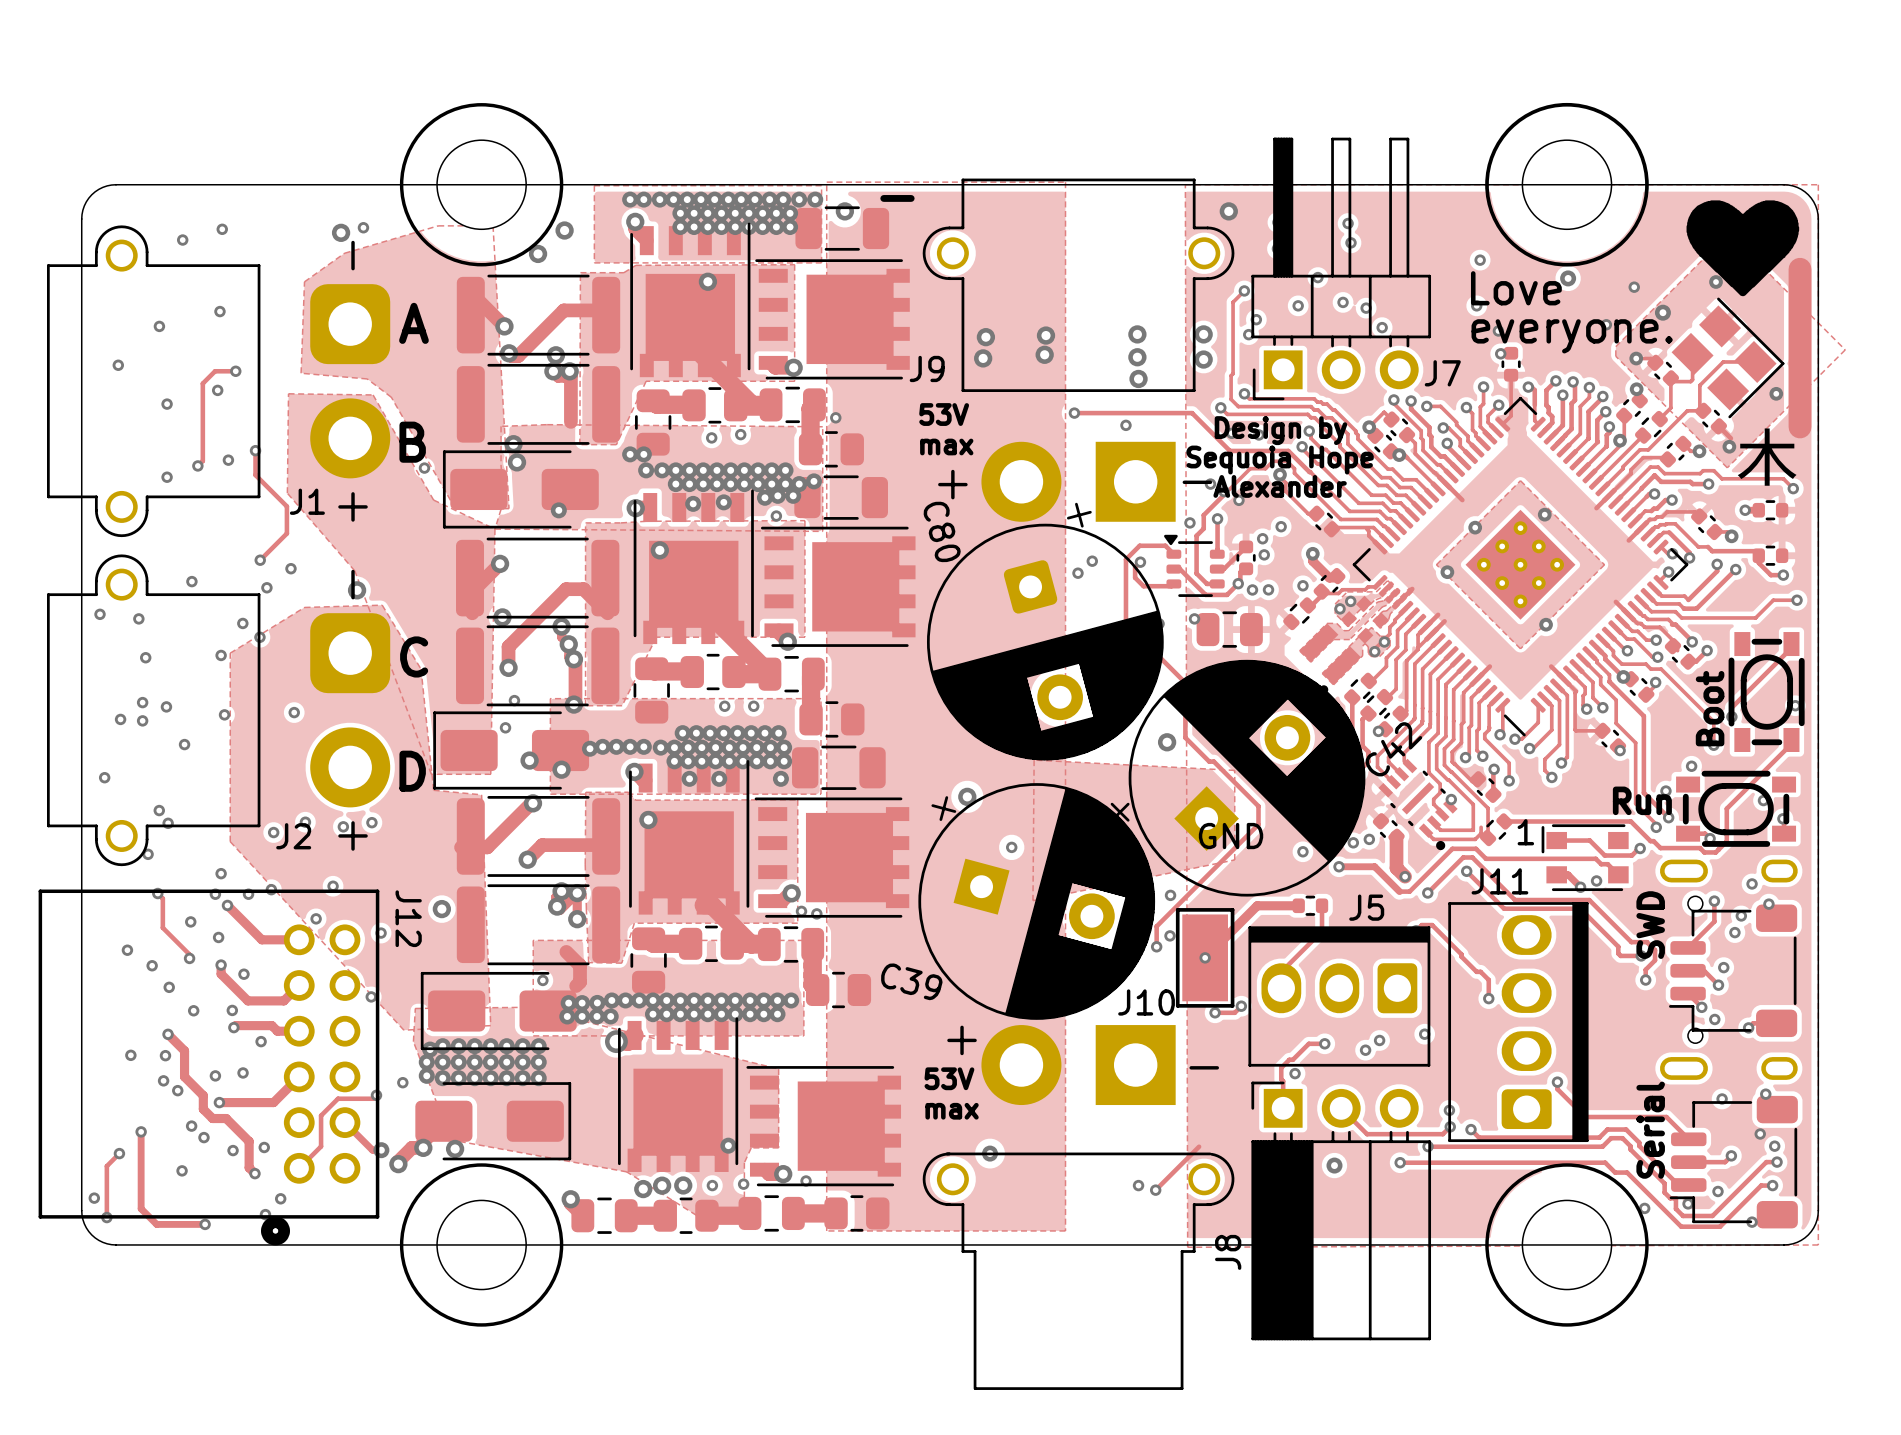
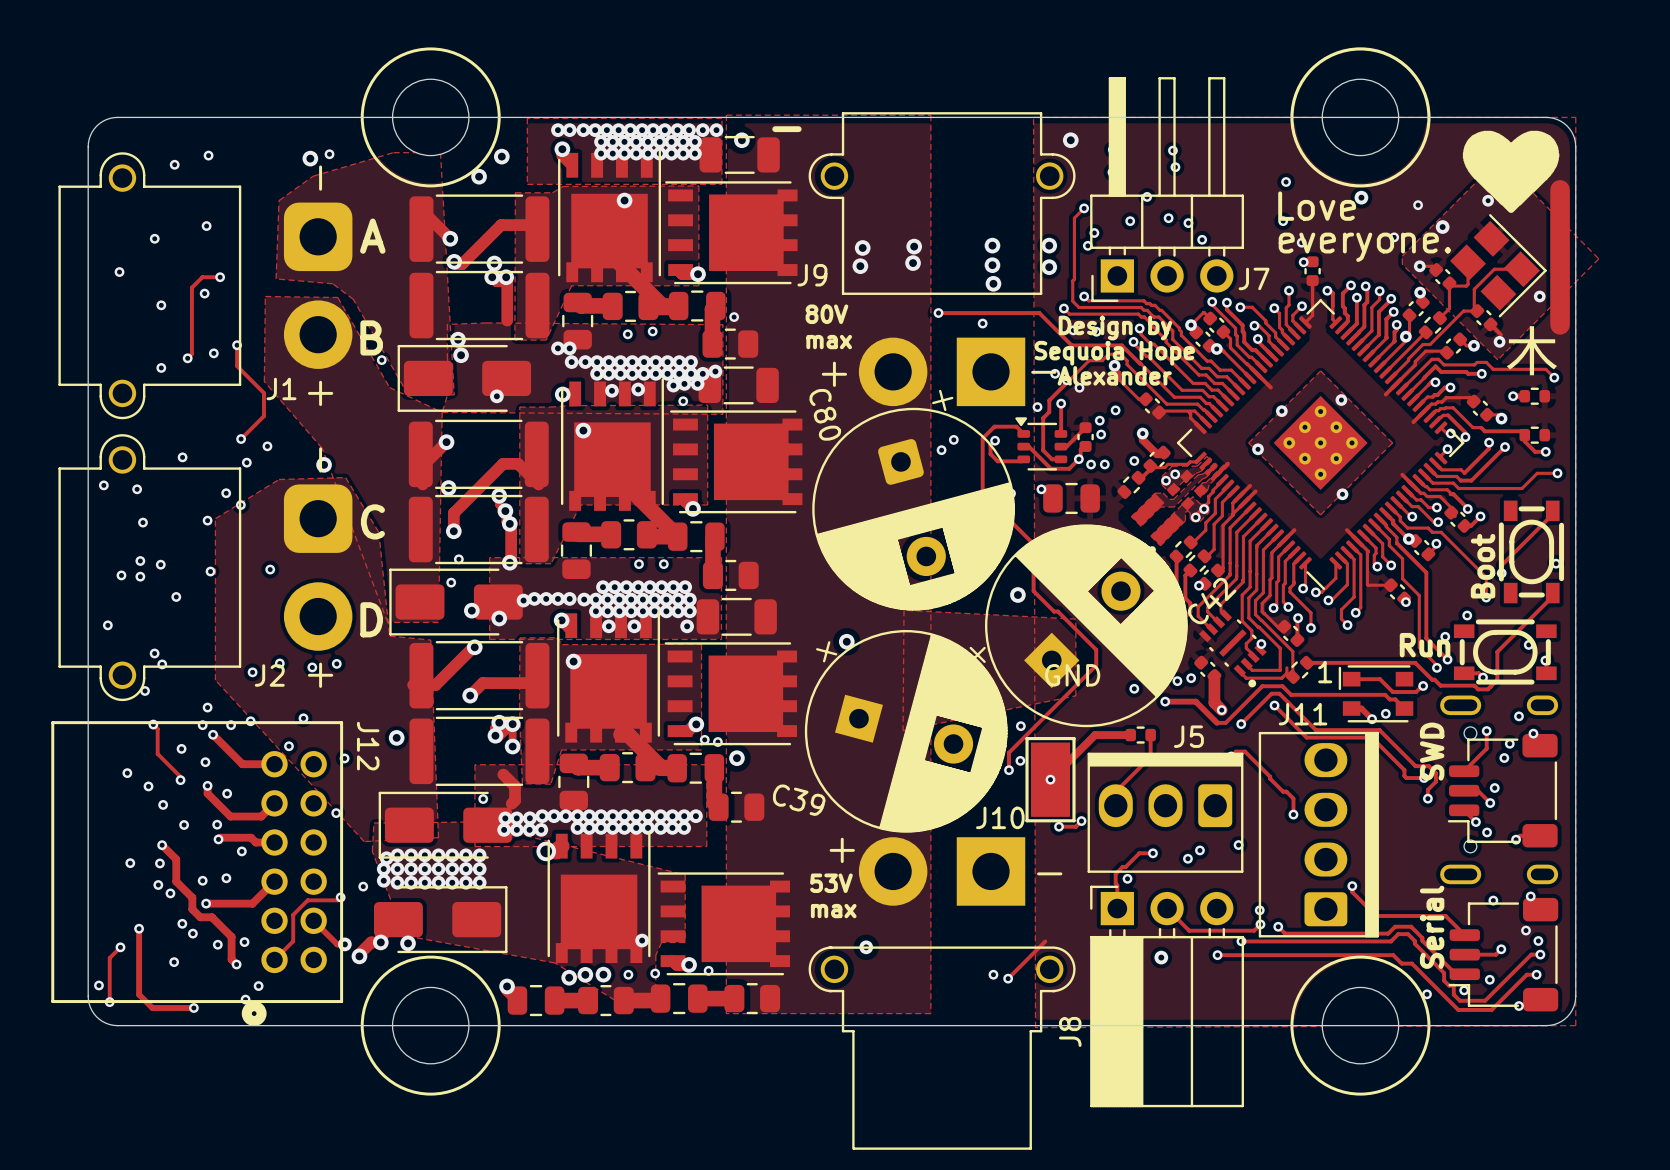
text: 53V (944, 414) -> 80V (826, 314)
via: (1011, 847) -> none
via: none -> (736, 758)

